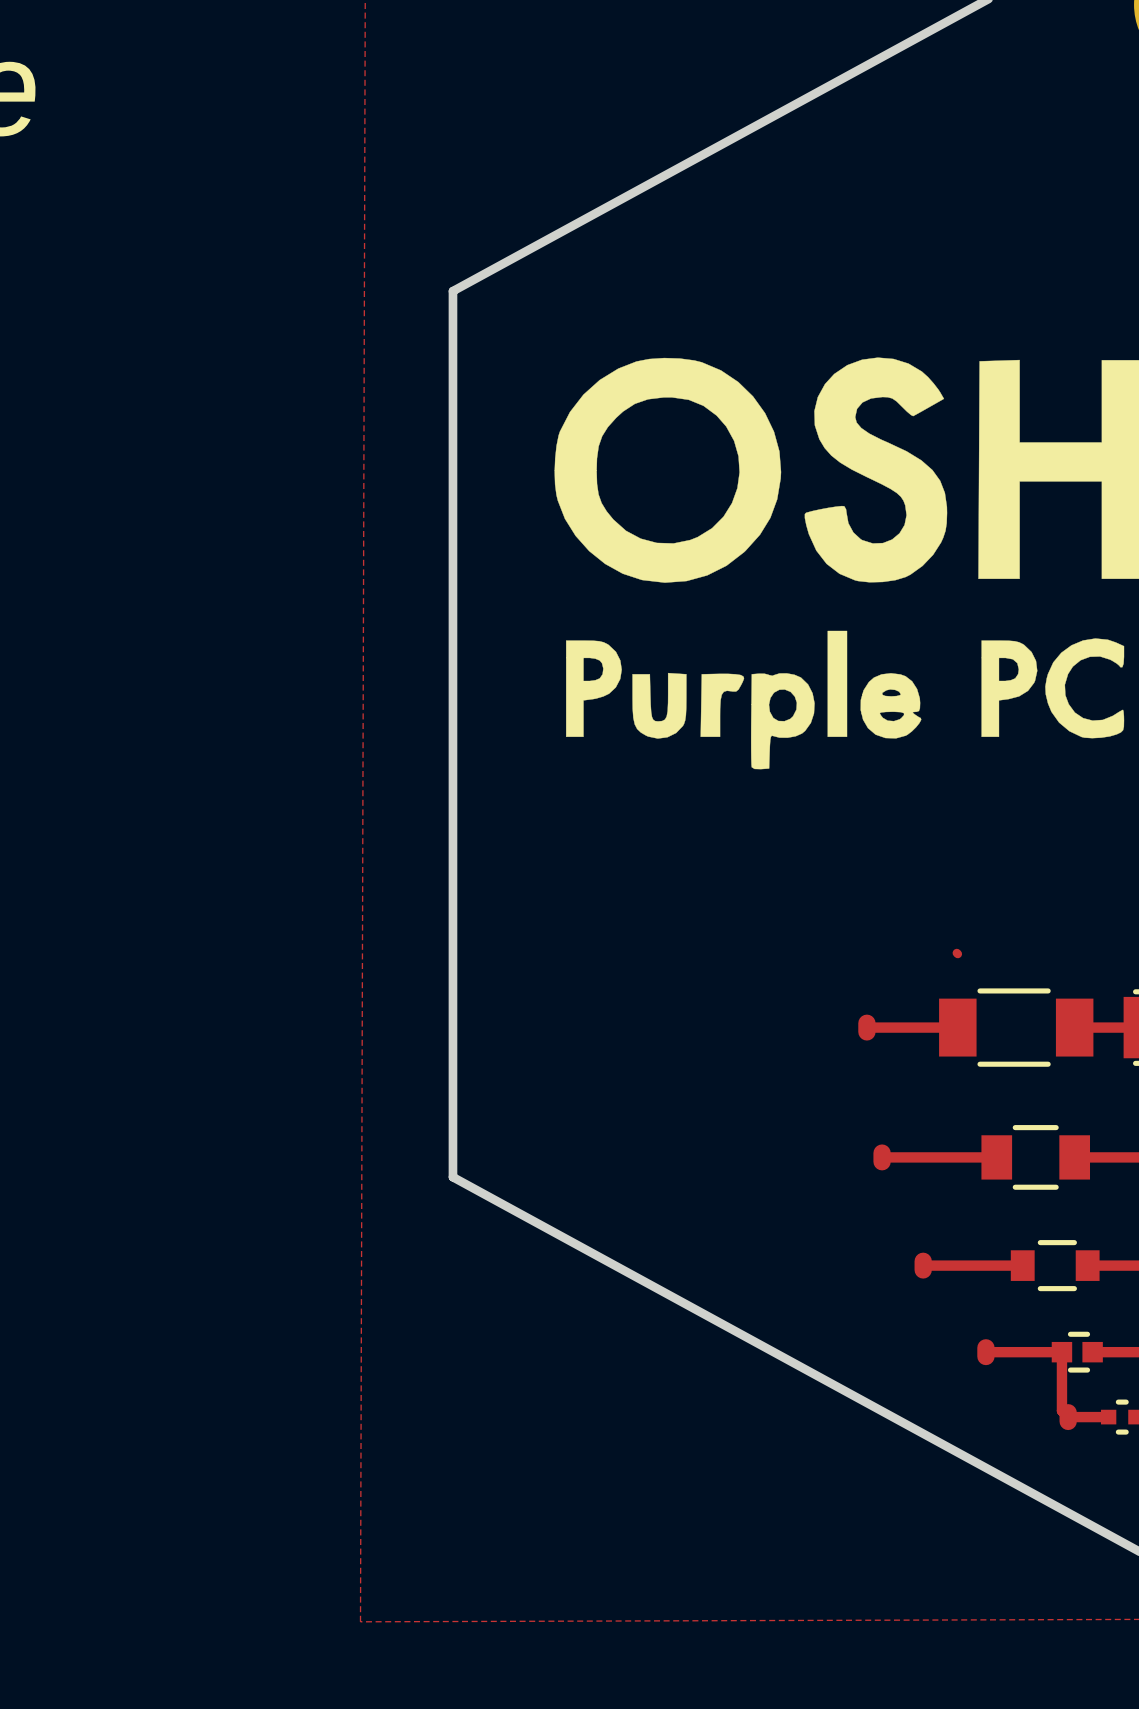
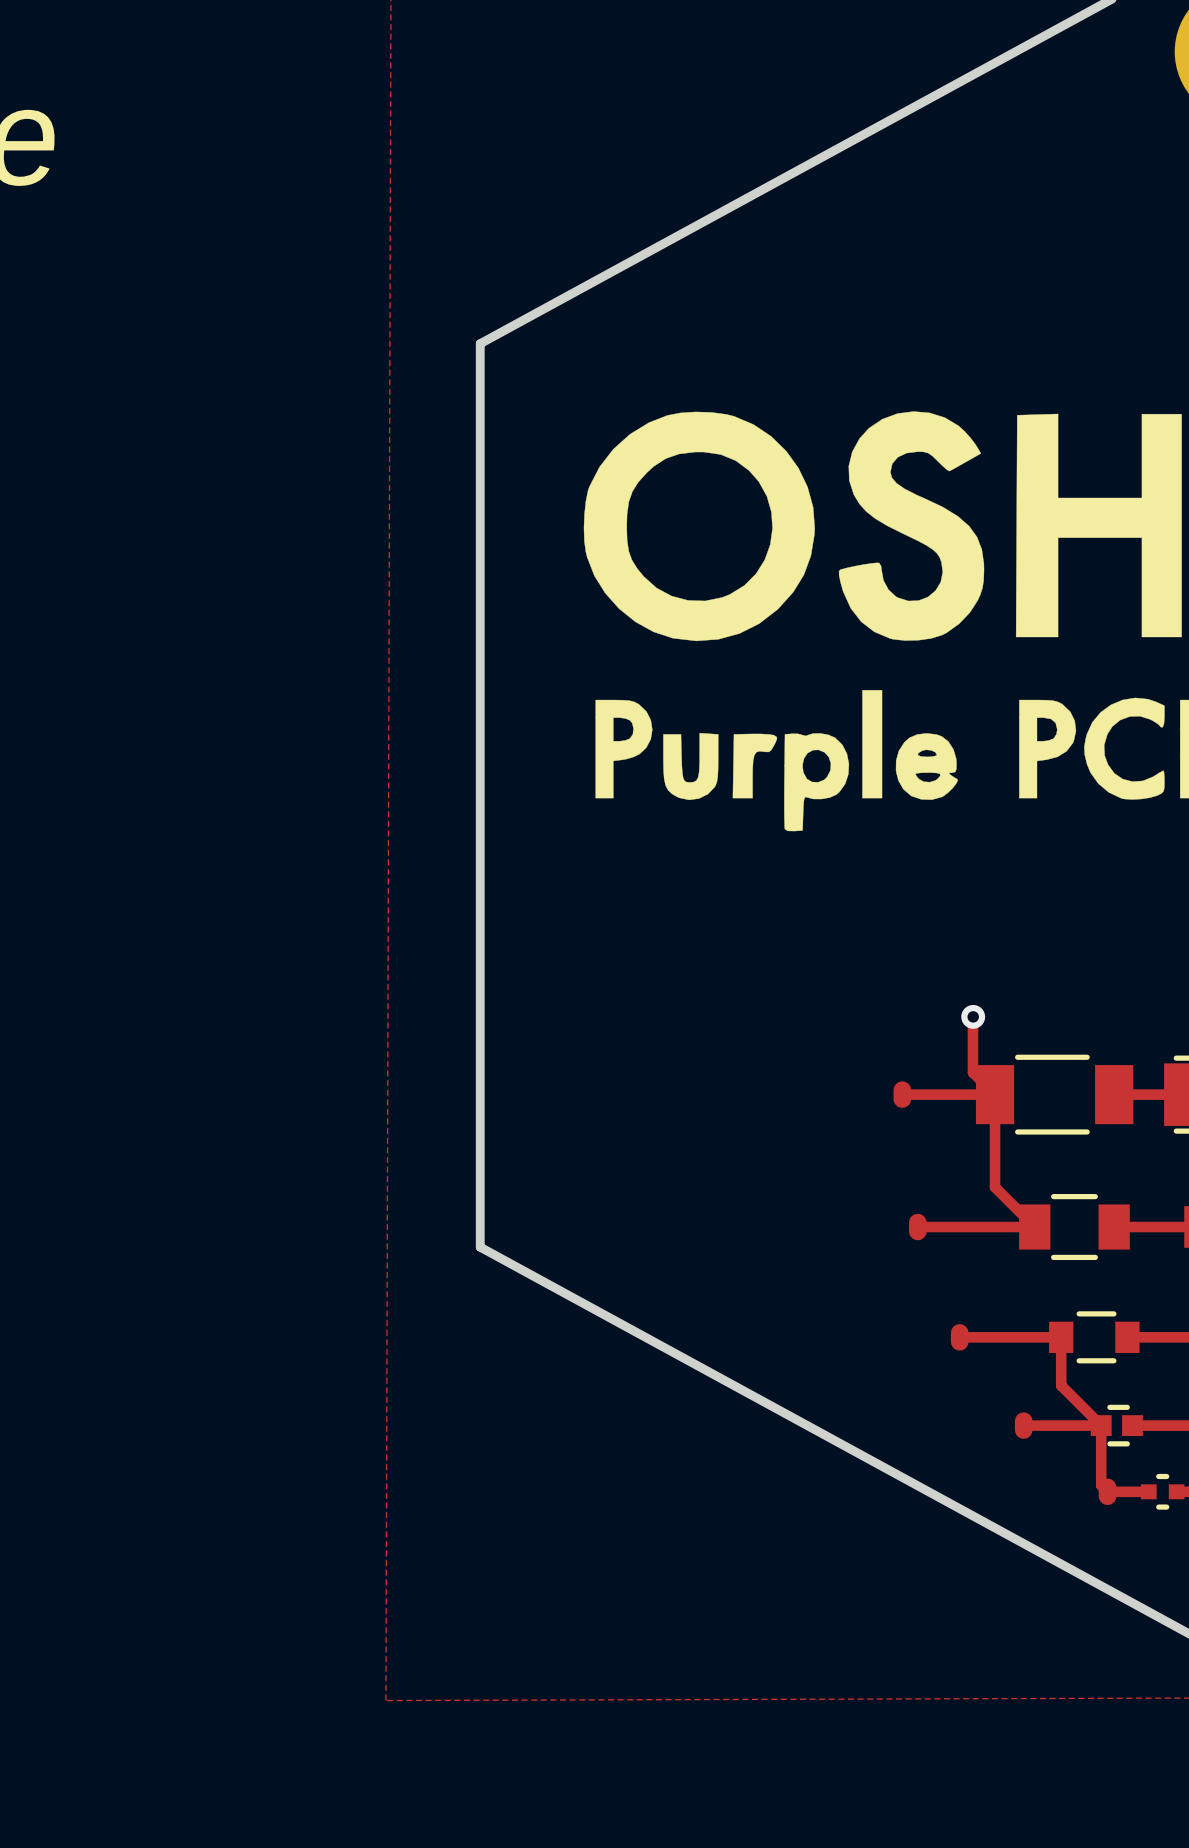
track: none -> (972, 1015) (972, 1072) (995, 1094) (995, 1187) (1034, 1227)
via: none -> (973, 1016)
track: (956, 953) (957, 954) -> none
track: none -> (1061, 1337) (1061, 1385) (1101, 1425)

